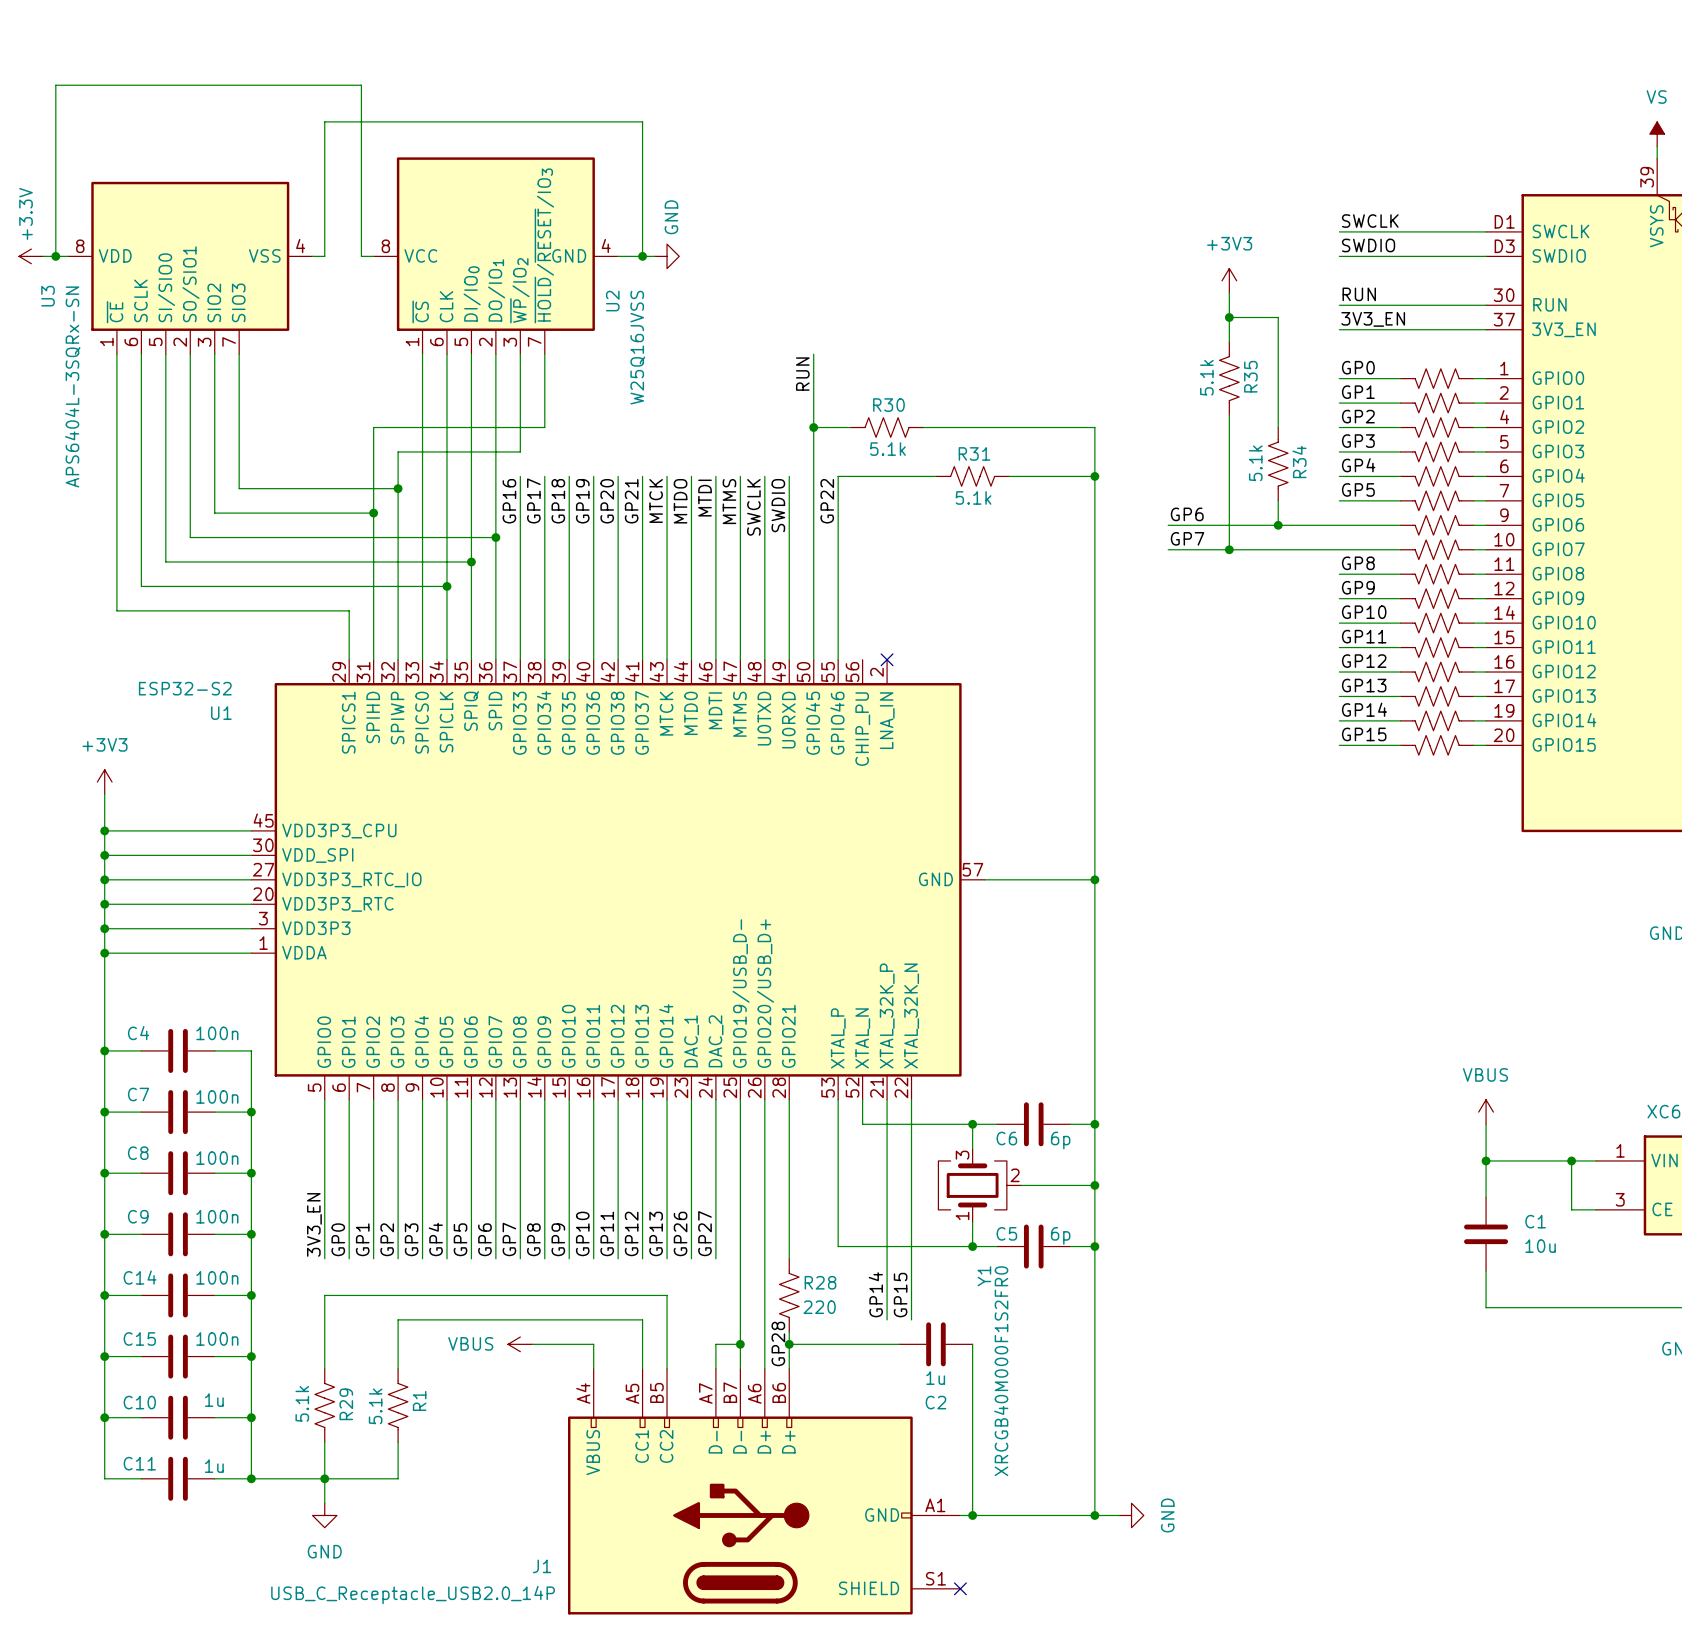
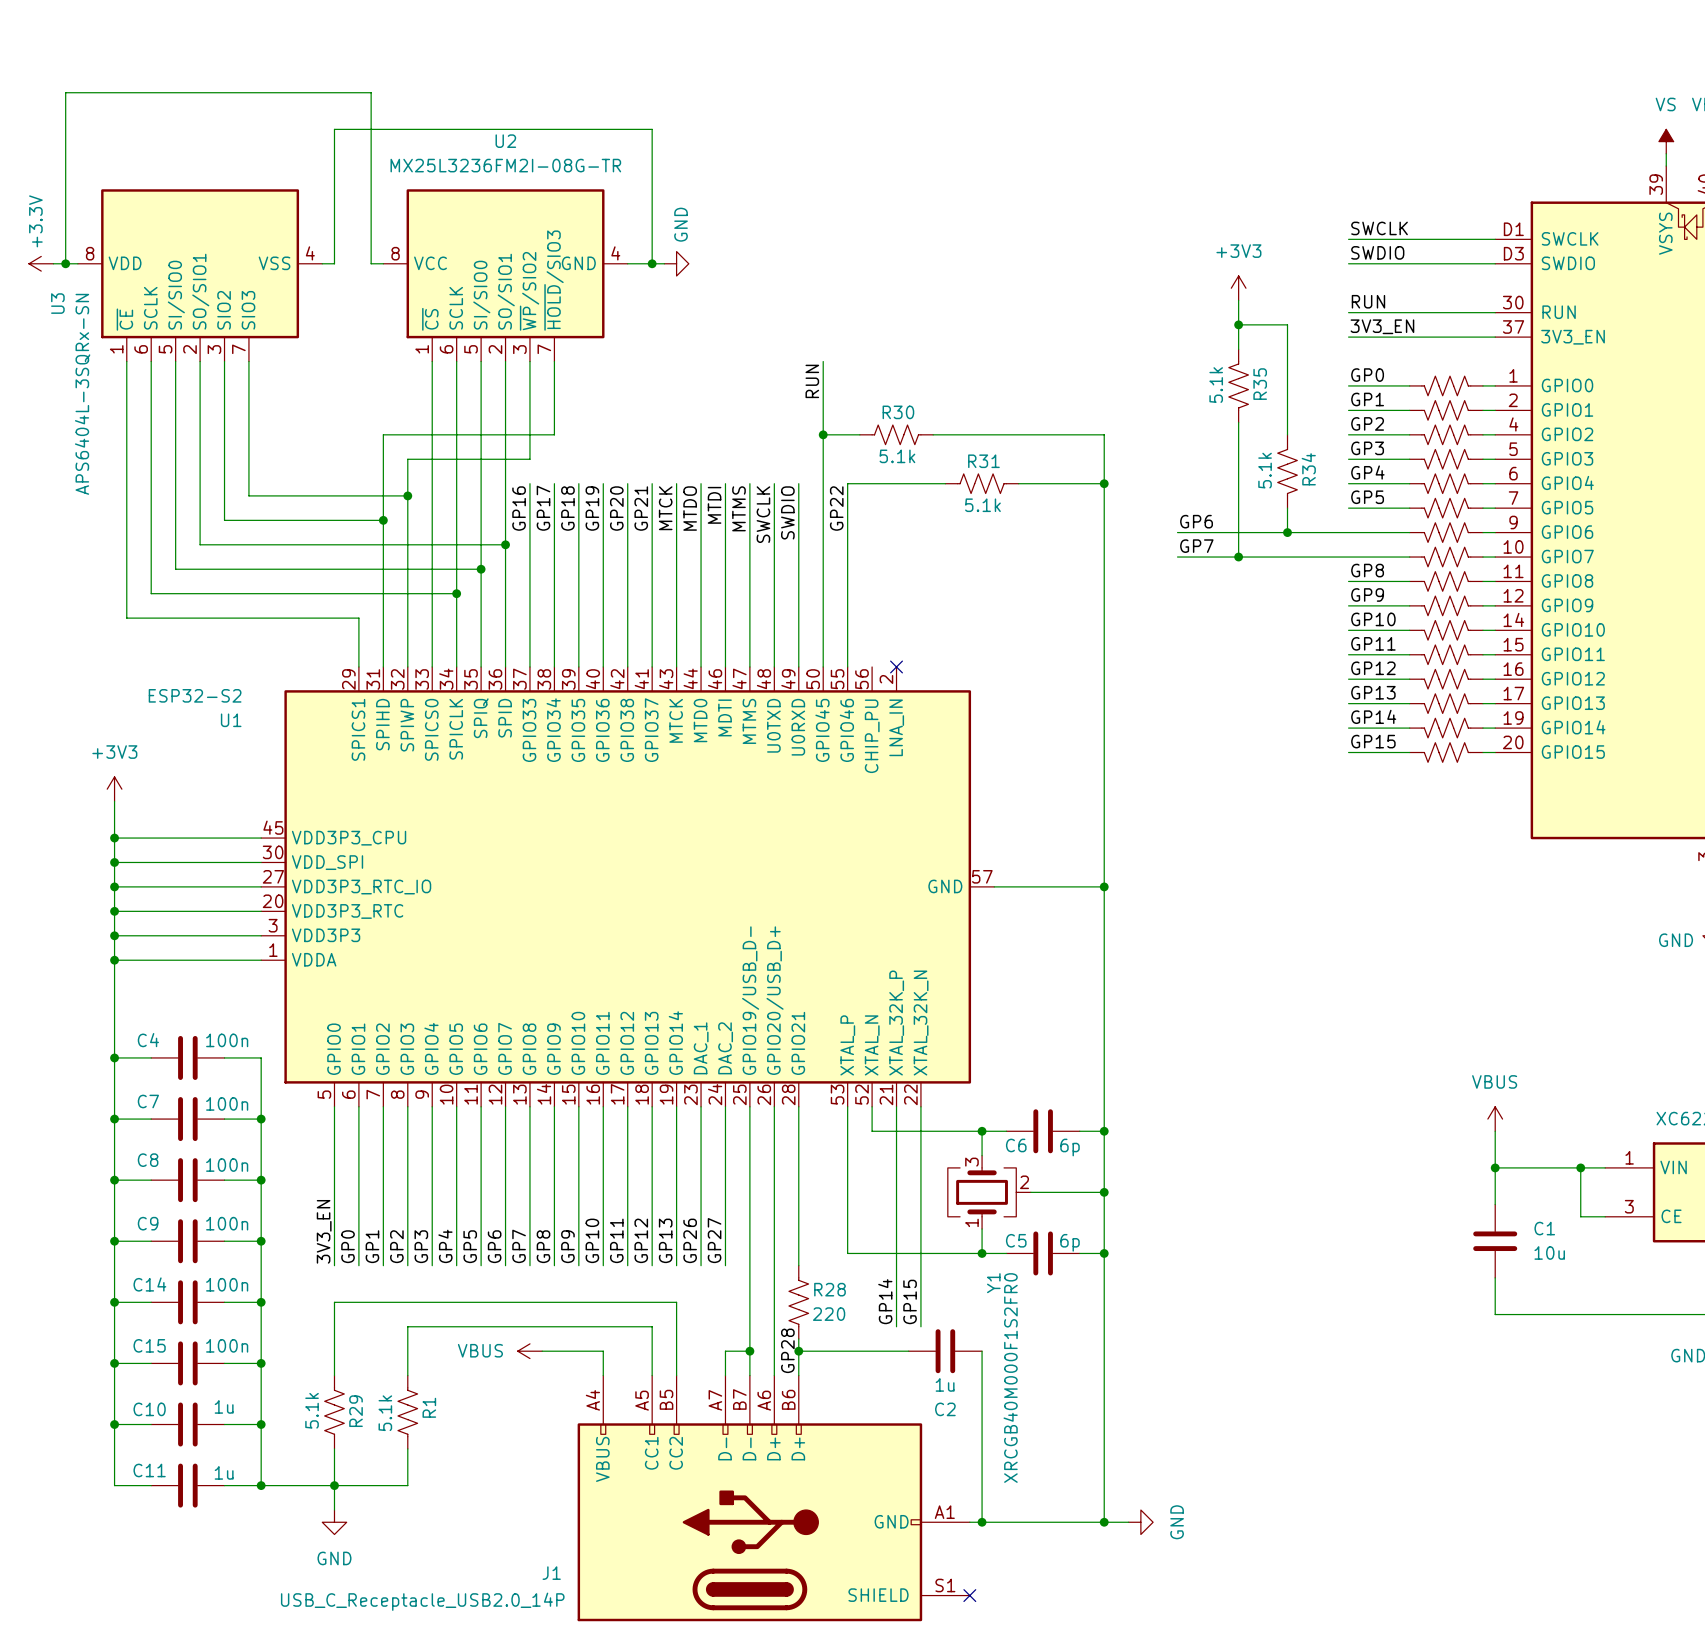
U2 symbol: [373, 157, 619, 355] -> [383, 189, 628, 362]
U2 name position: U2 (612, 301) -> U2 (505, 141)
U2 value: W25Q16JVSS (637, 347) -> MX25L3236FM2I-08G-TR (505, 165)

